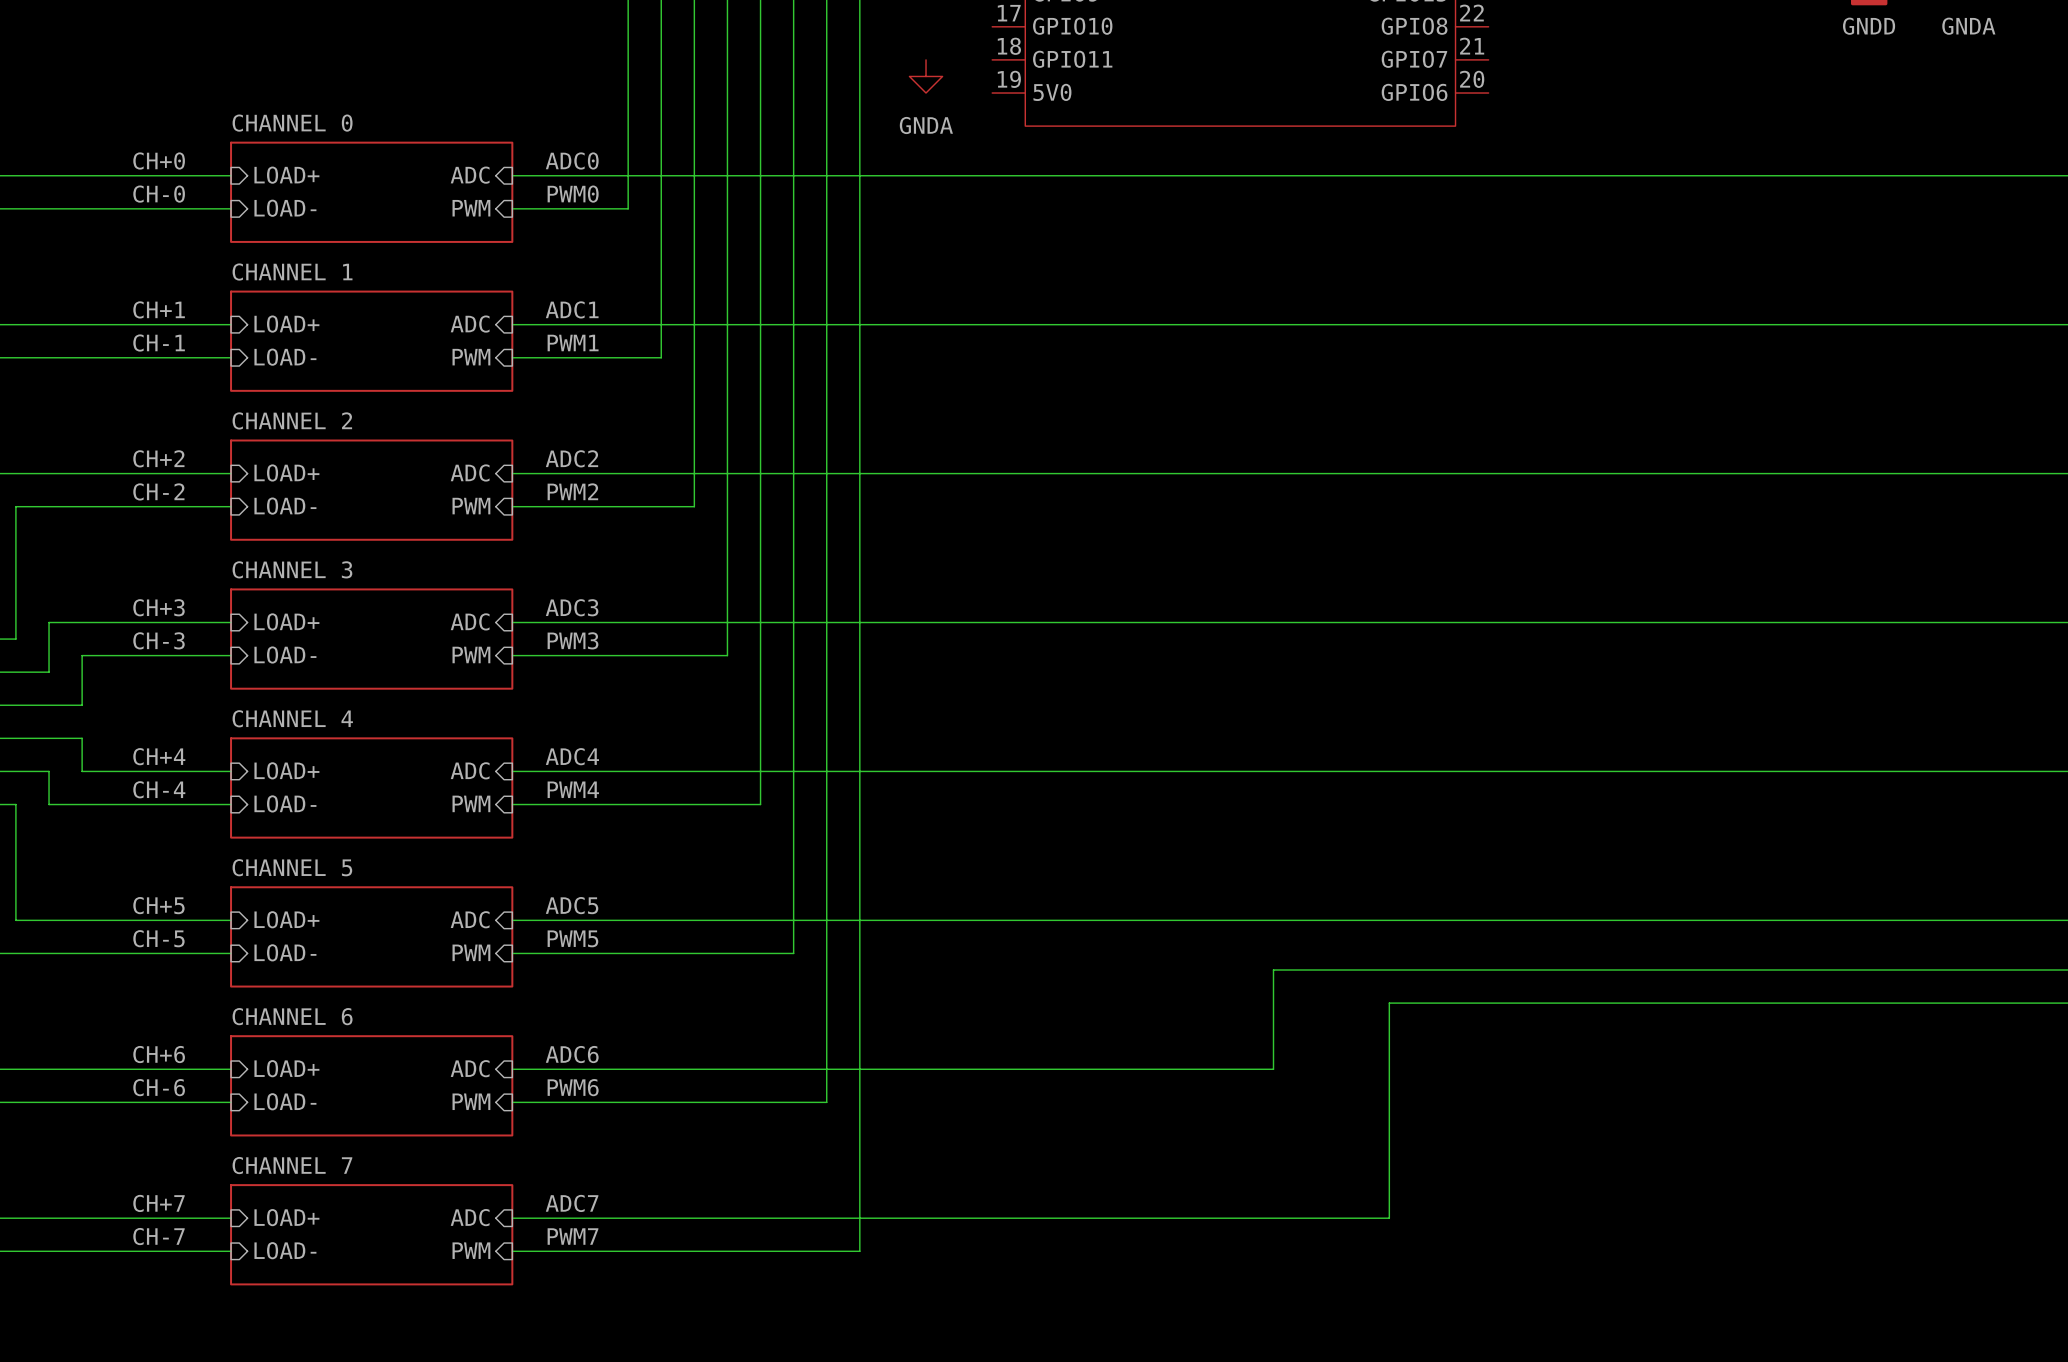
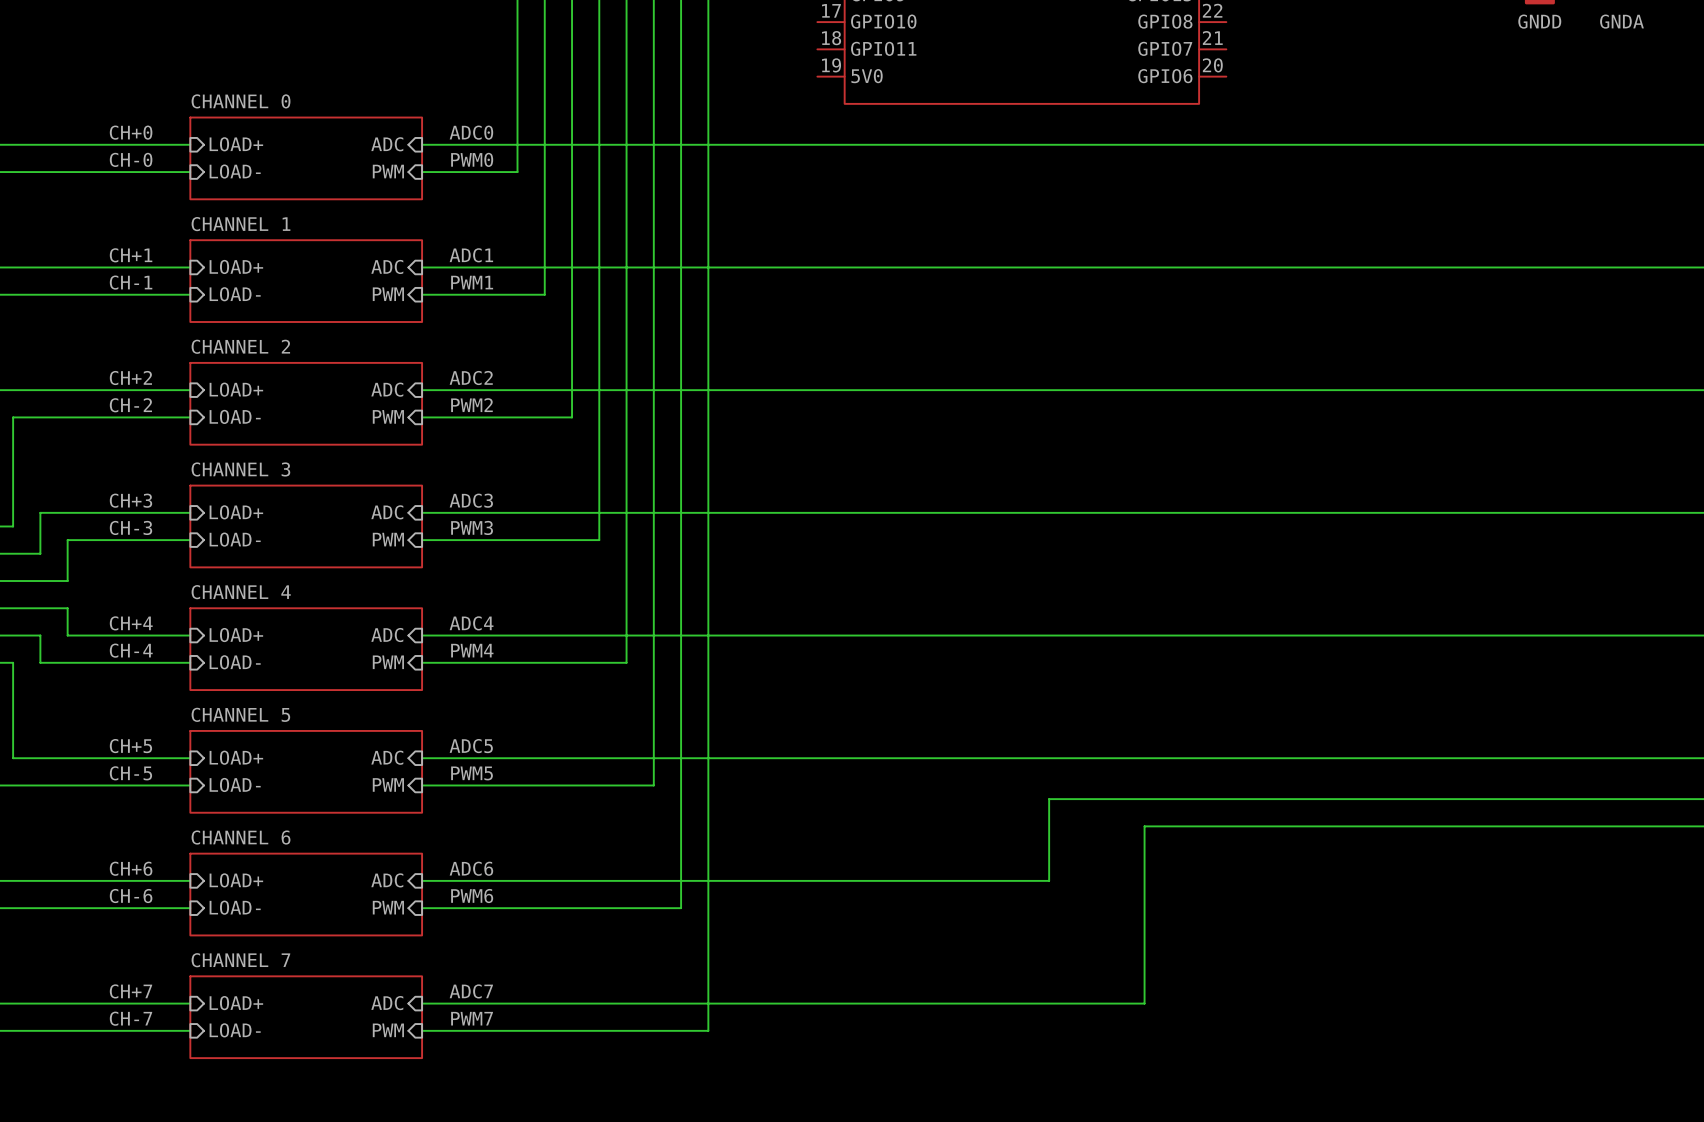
power symbol: GNDA (926, 76) -> none

